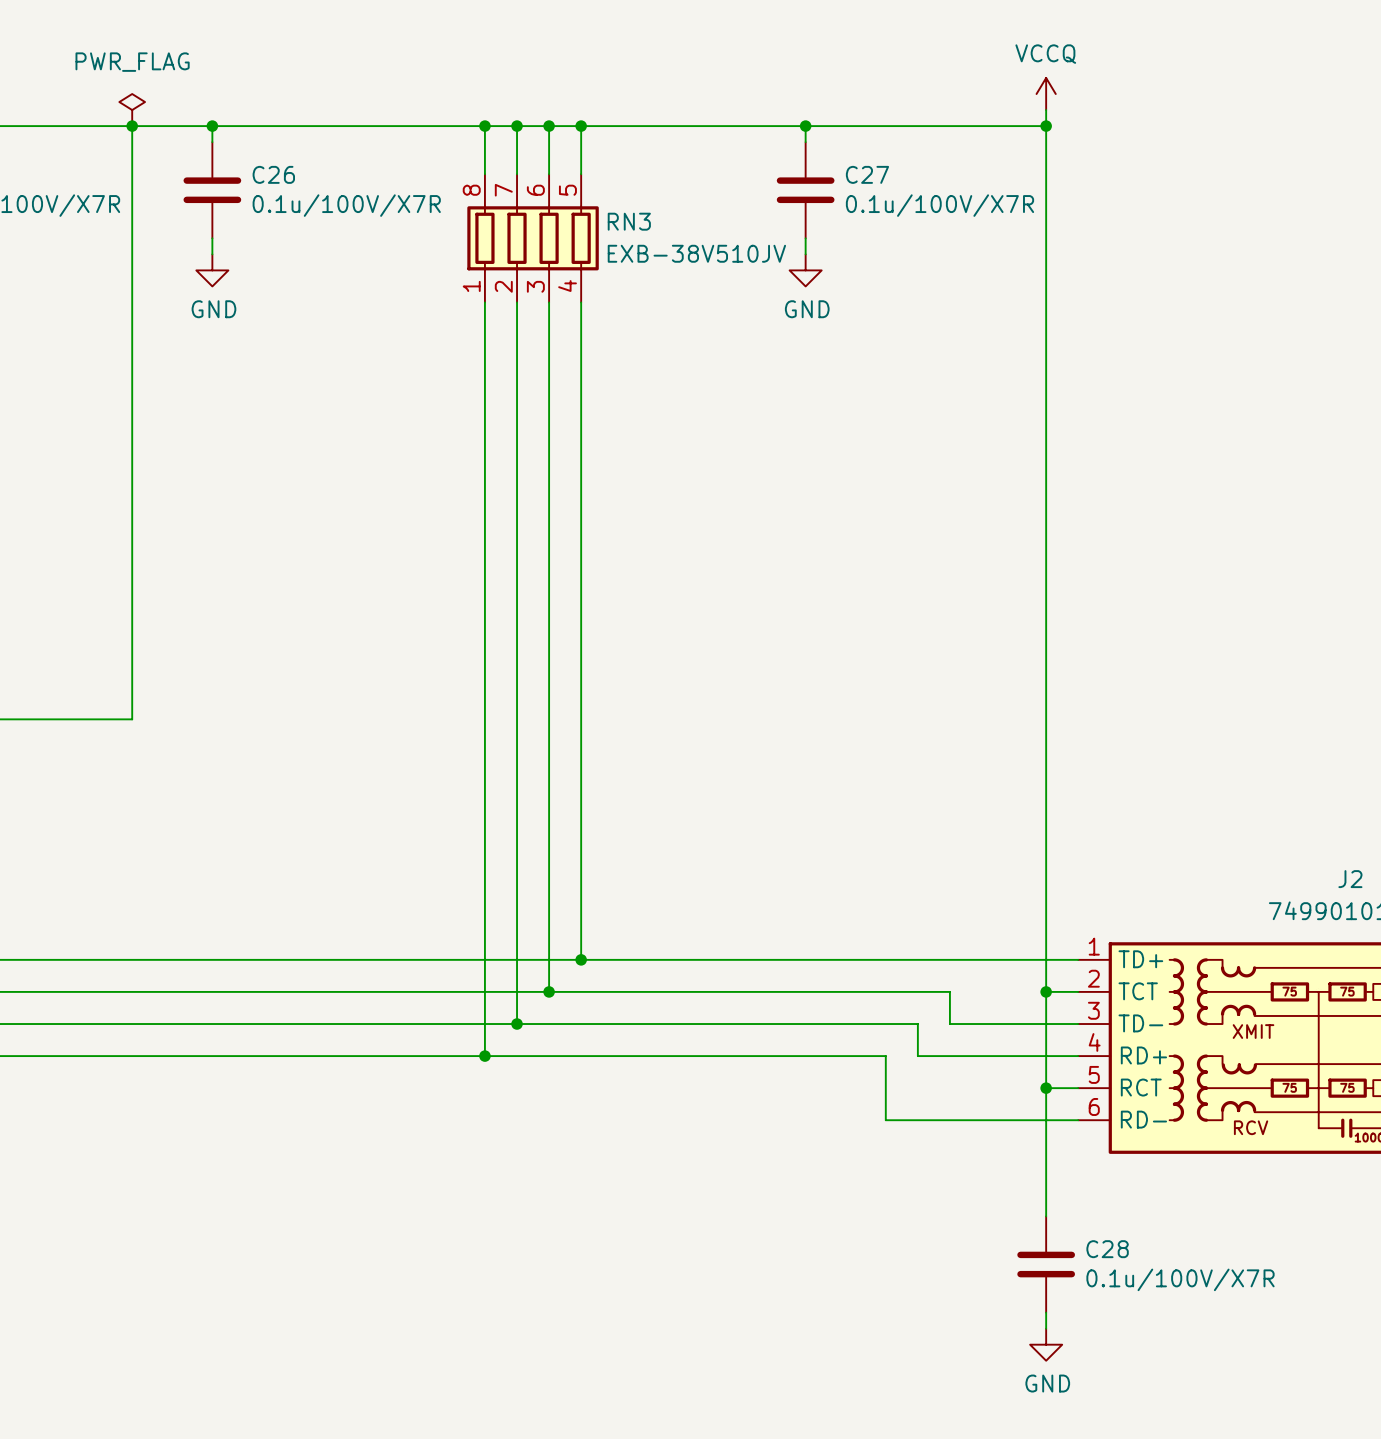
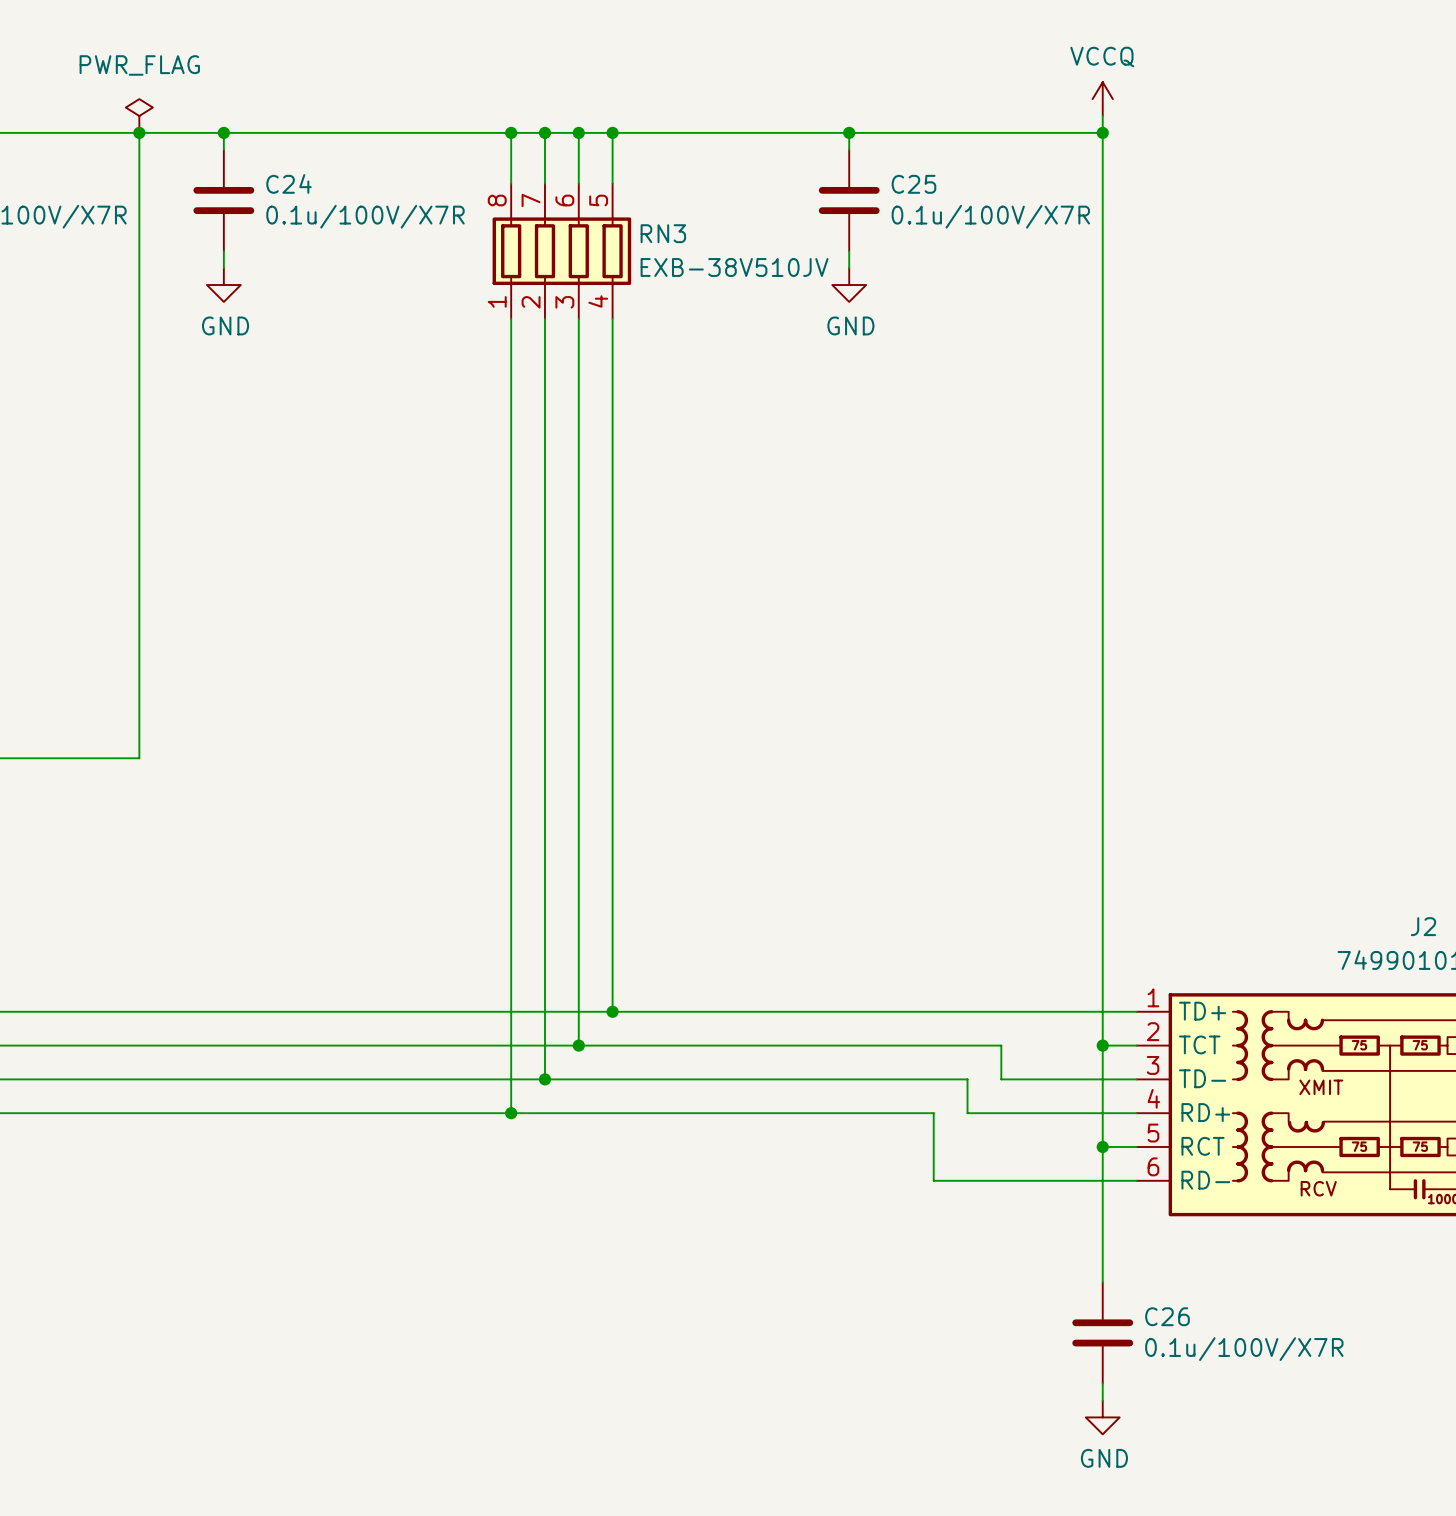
C26 name: C26 (273, 174) -> C24 (289, 183)
C27 name: C27 (867, 174) -> C25 (913, 184)
C28 name: C28 (1107, 1249) -> C26 (1167, 1316)

